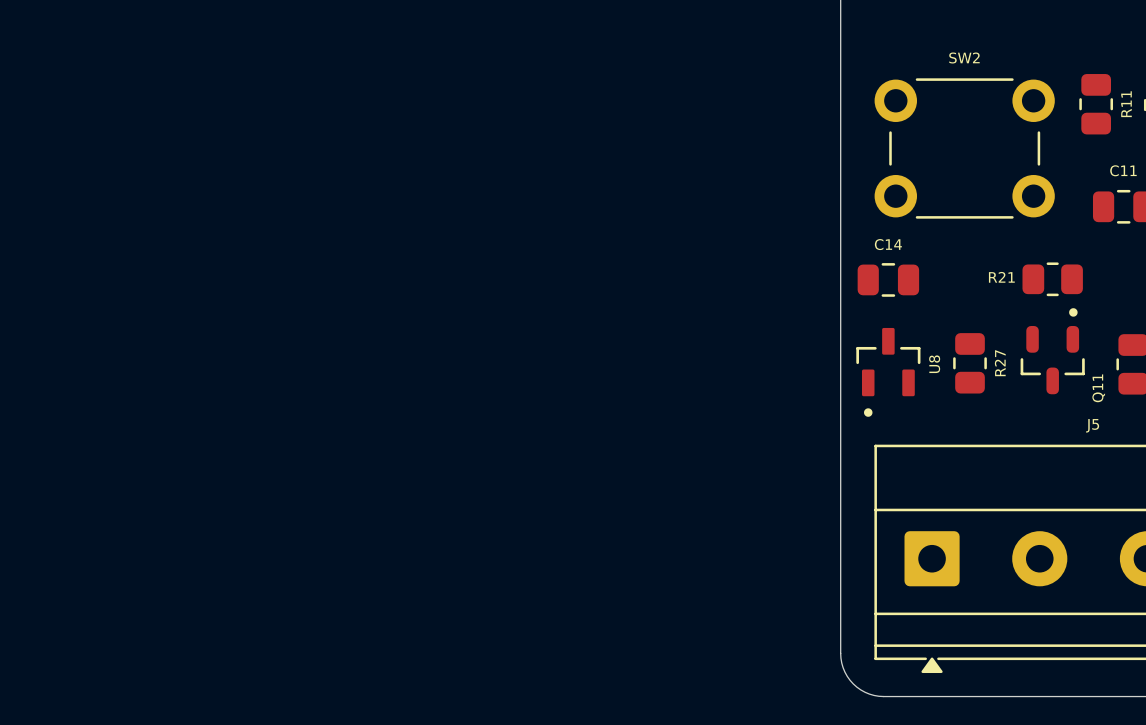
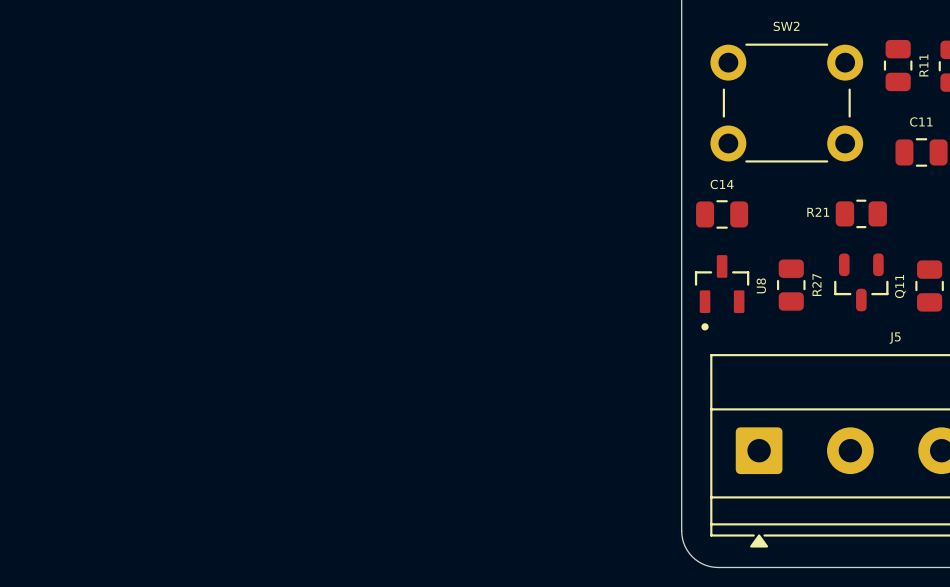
Q11 footprint: [1020, 308, 1085, 395] -> [834, 253, 889, 312]

